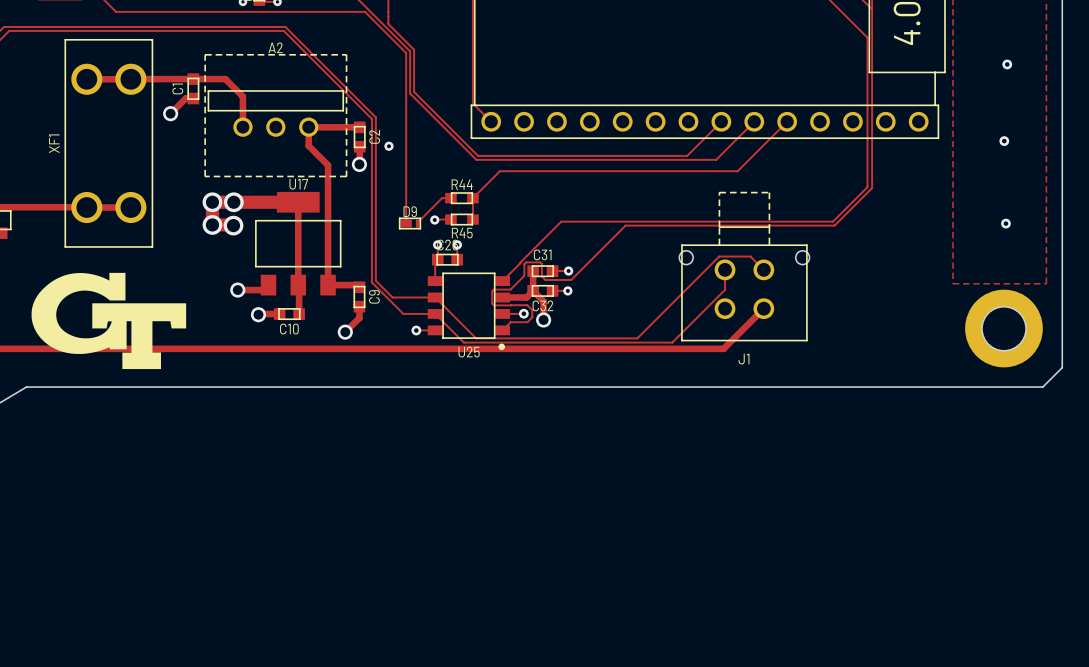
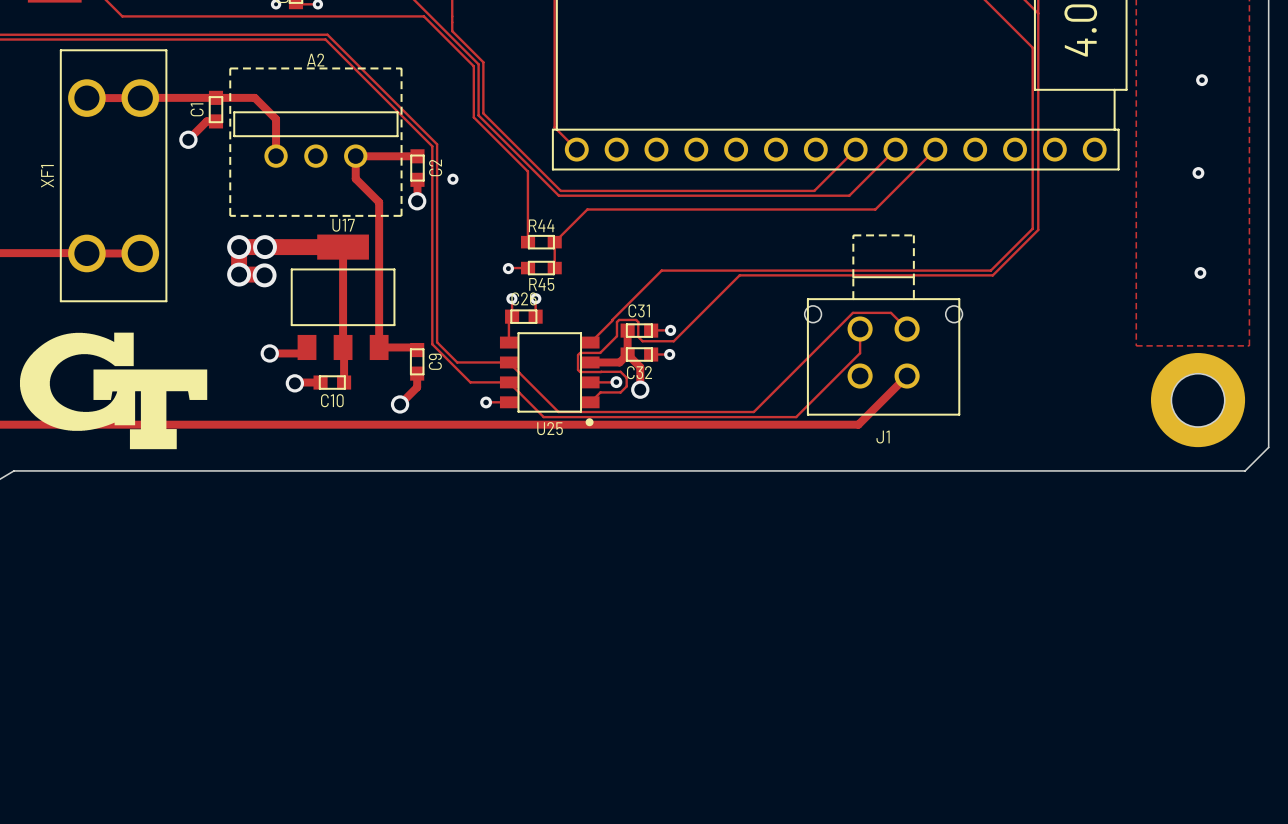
track: (406, 95) (406, 223) -> (473, 117) (527, 171) (527, 242)
track: (450, 198) (442, 198) (417, 223) -> none
D9: (410, 223) -> none

